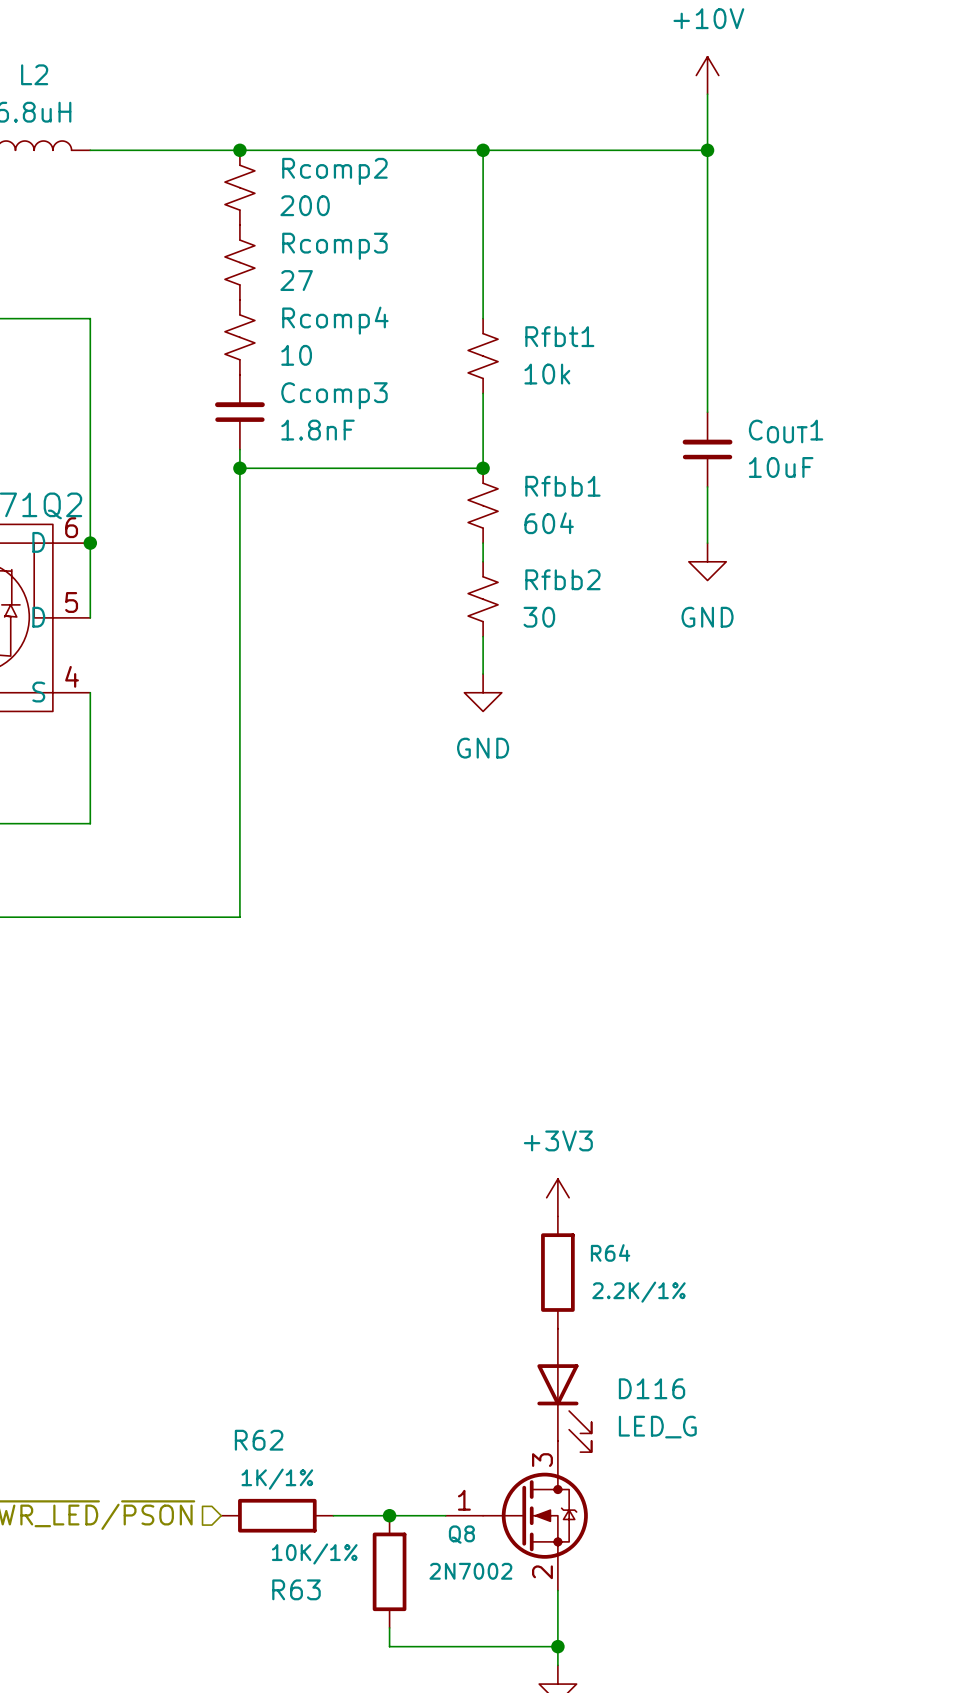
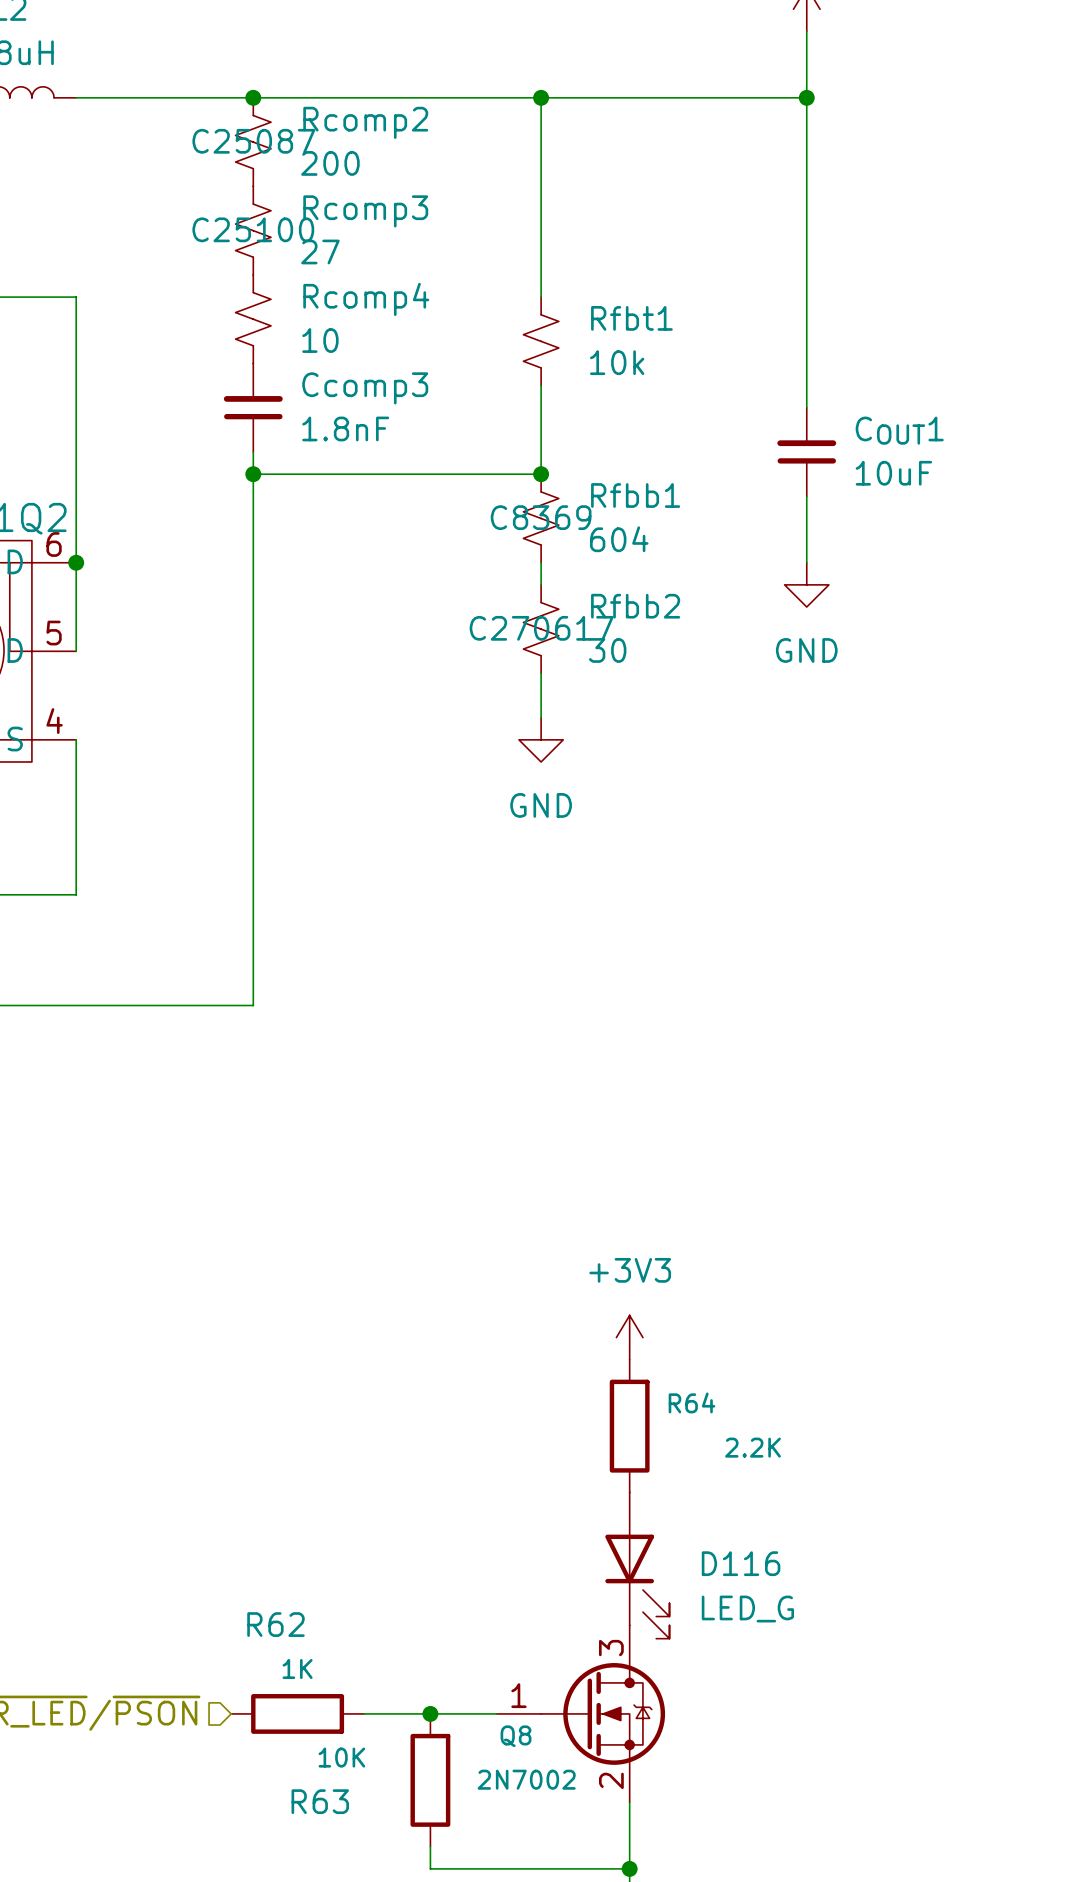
Rcomp2 text: none -> C25087 (253, 141)
Rcomp3 text: none -> C25100 (253, 229)
Rfbb1 text: none -> C8369 (541, 517)
Rfbb2 text: none -> C270617 (541, 628)
R64 value: 2.2K/1% (638, 1292) -> 2.2K (752, 1447)
R62 value: 1K/1% (277, 1479) -> 1K (297, 1669)
R63 value: 10K/1% (314, 1553) -> 10K (341, 1757)

